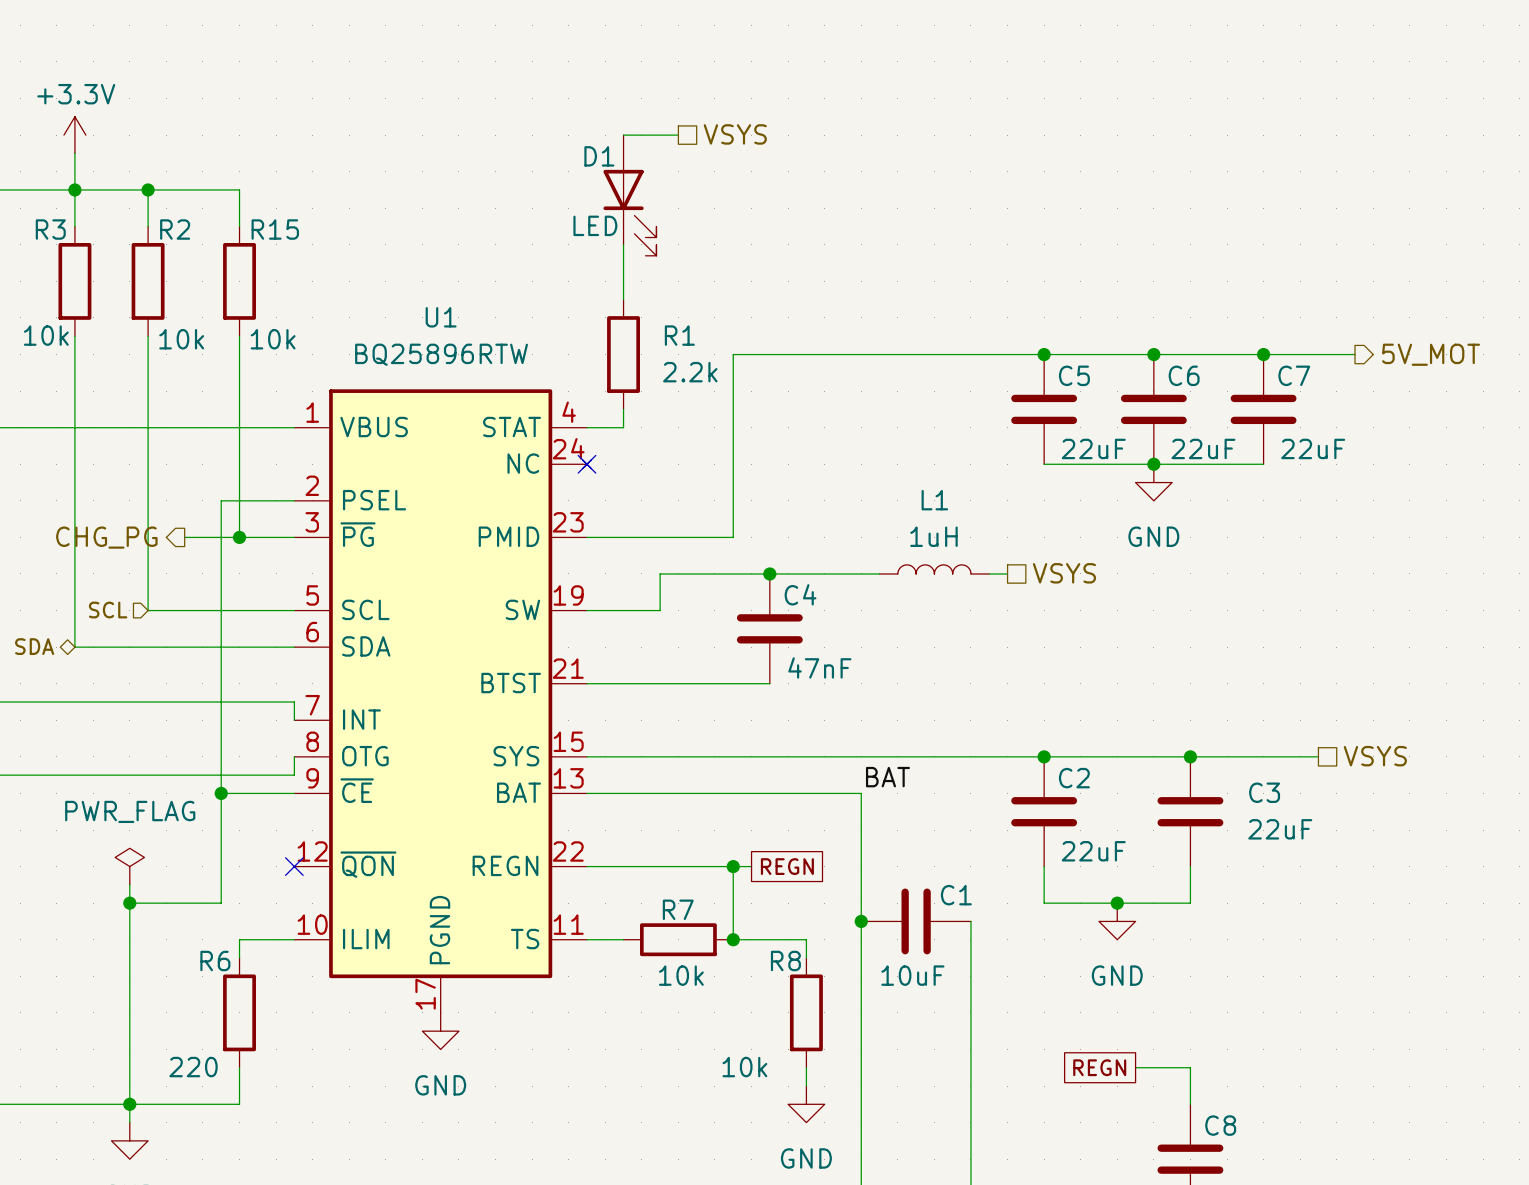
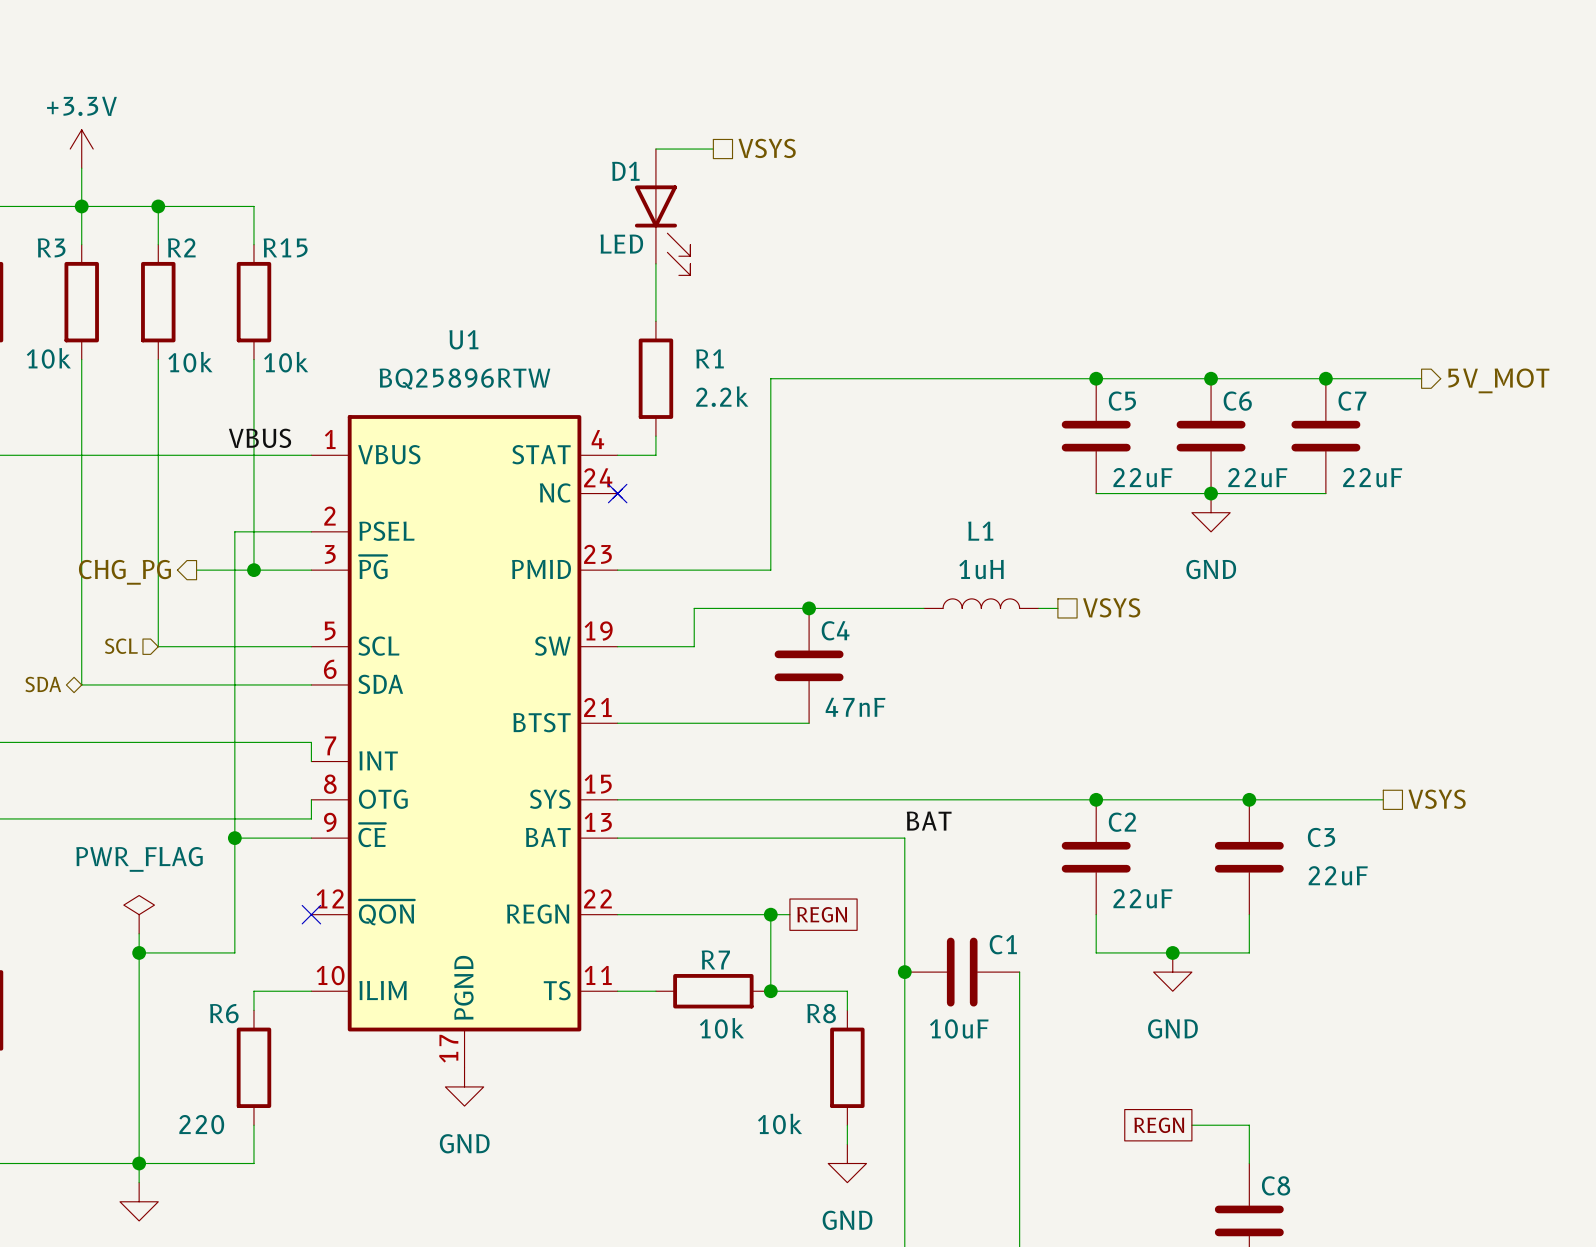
label: none -> VBUS (260, 438)

